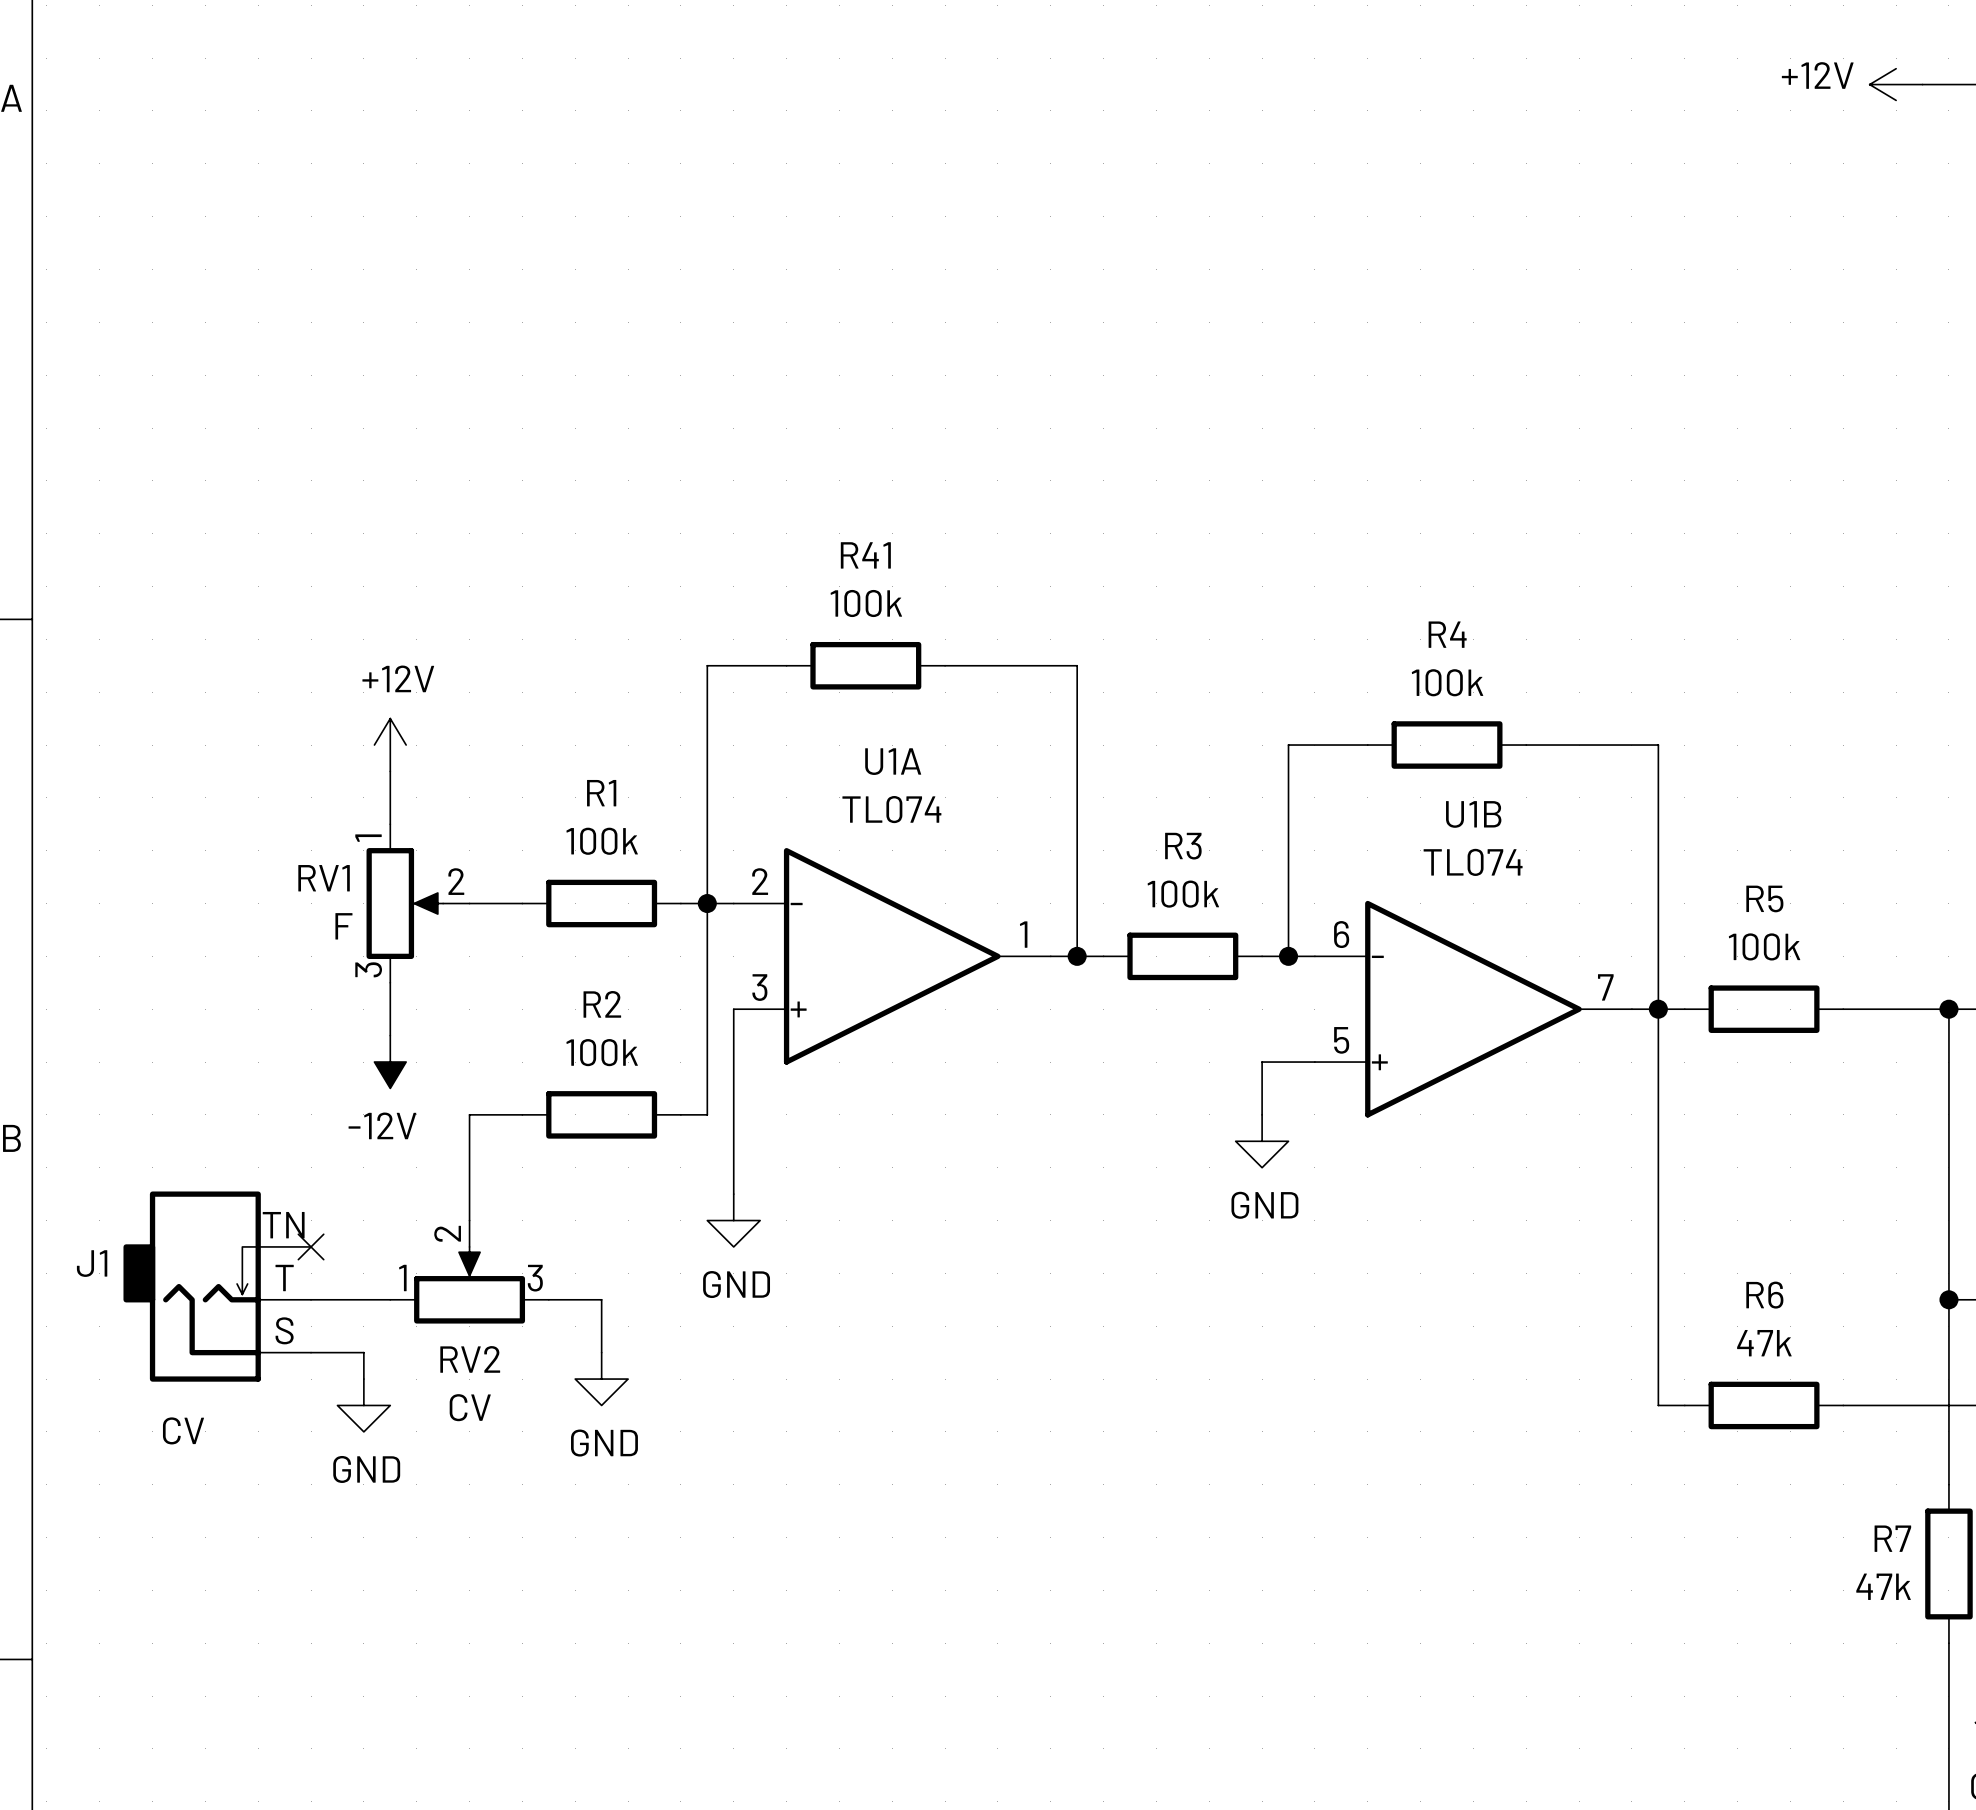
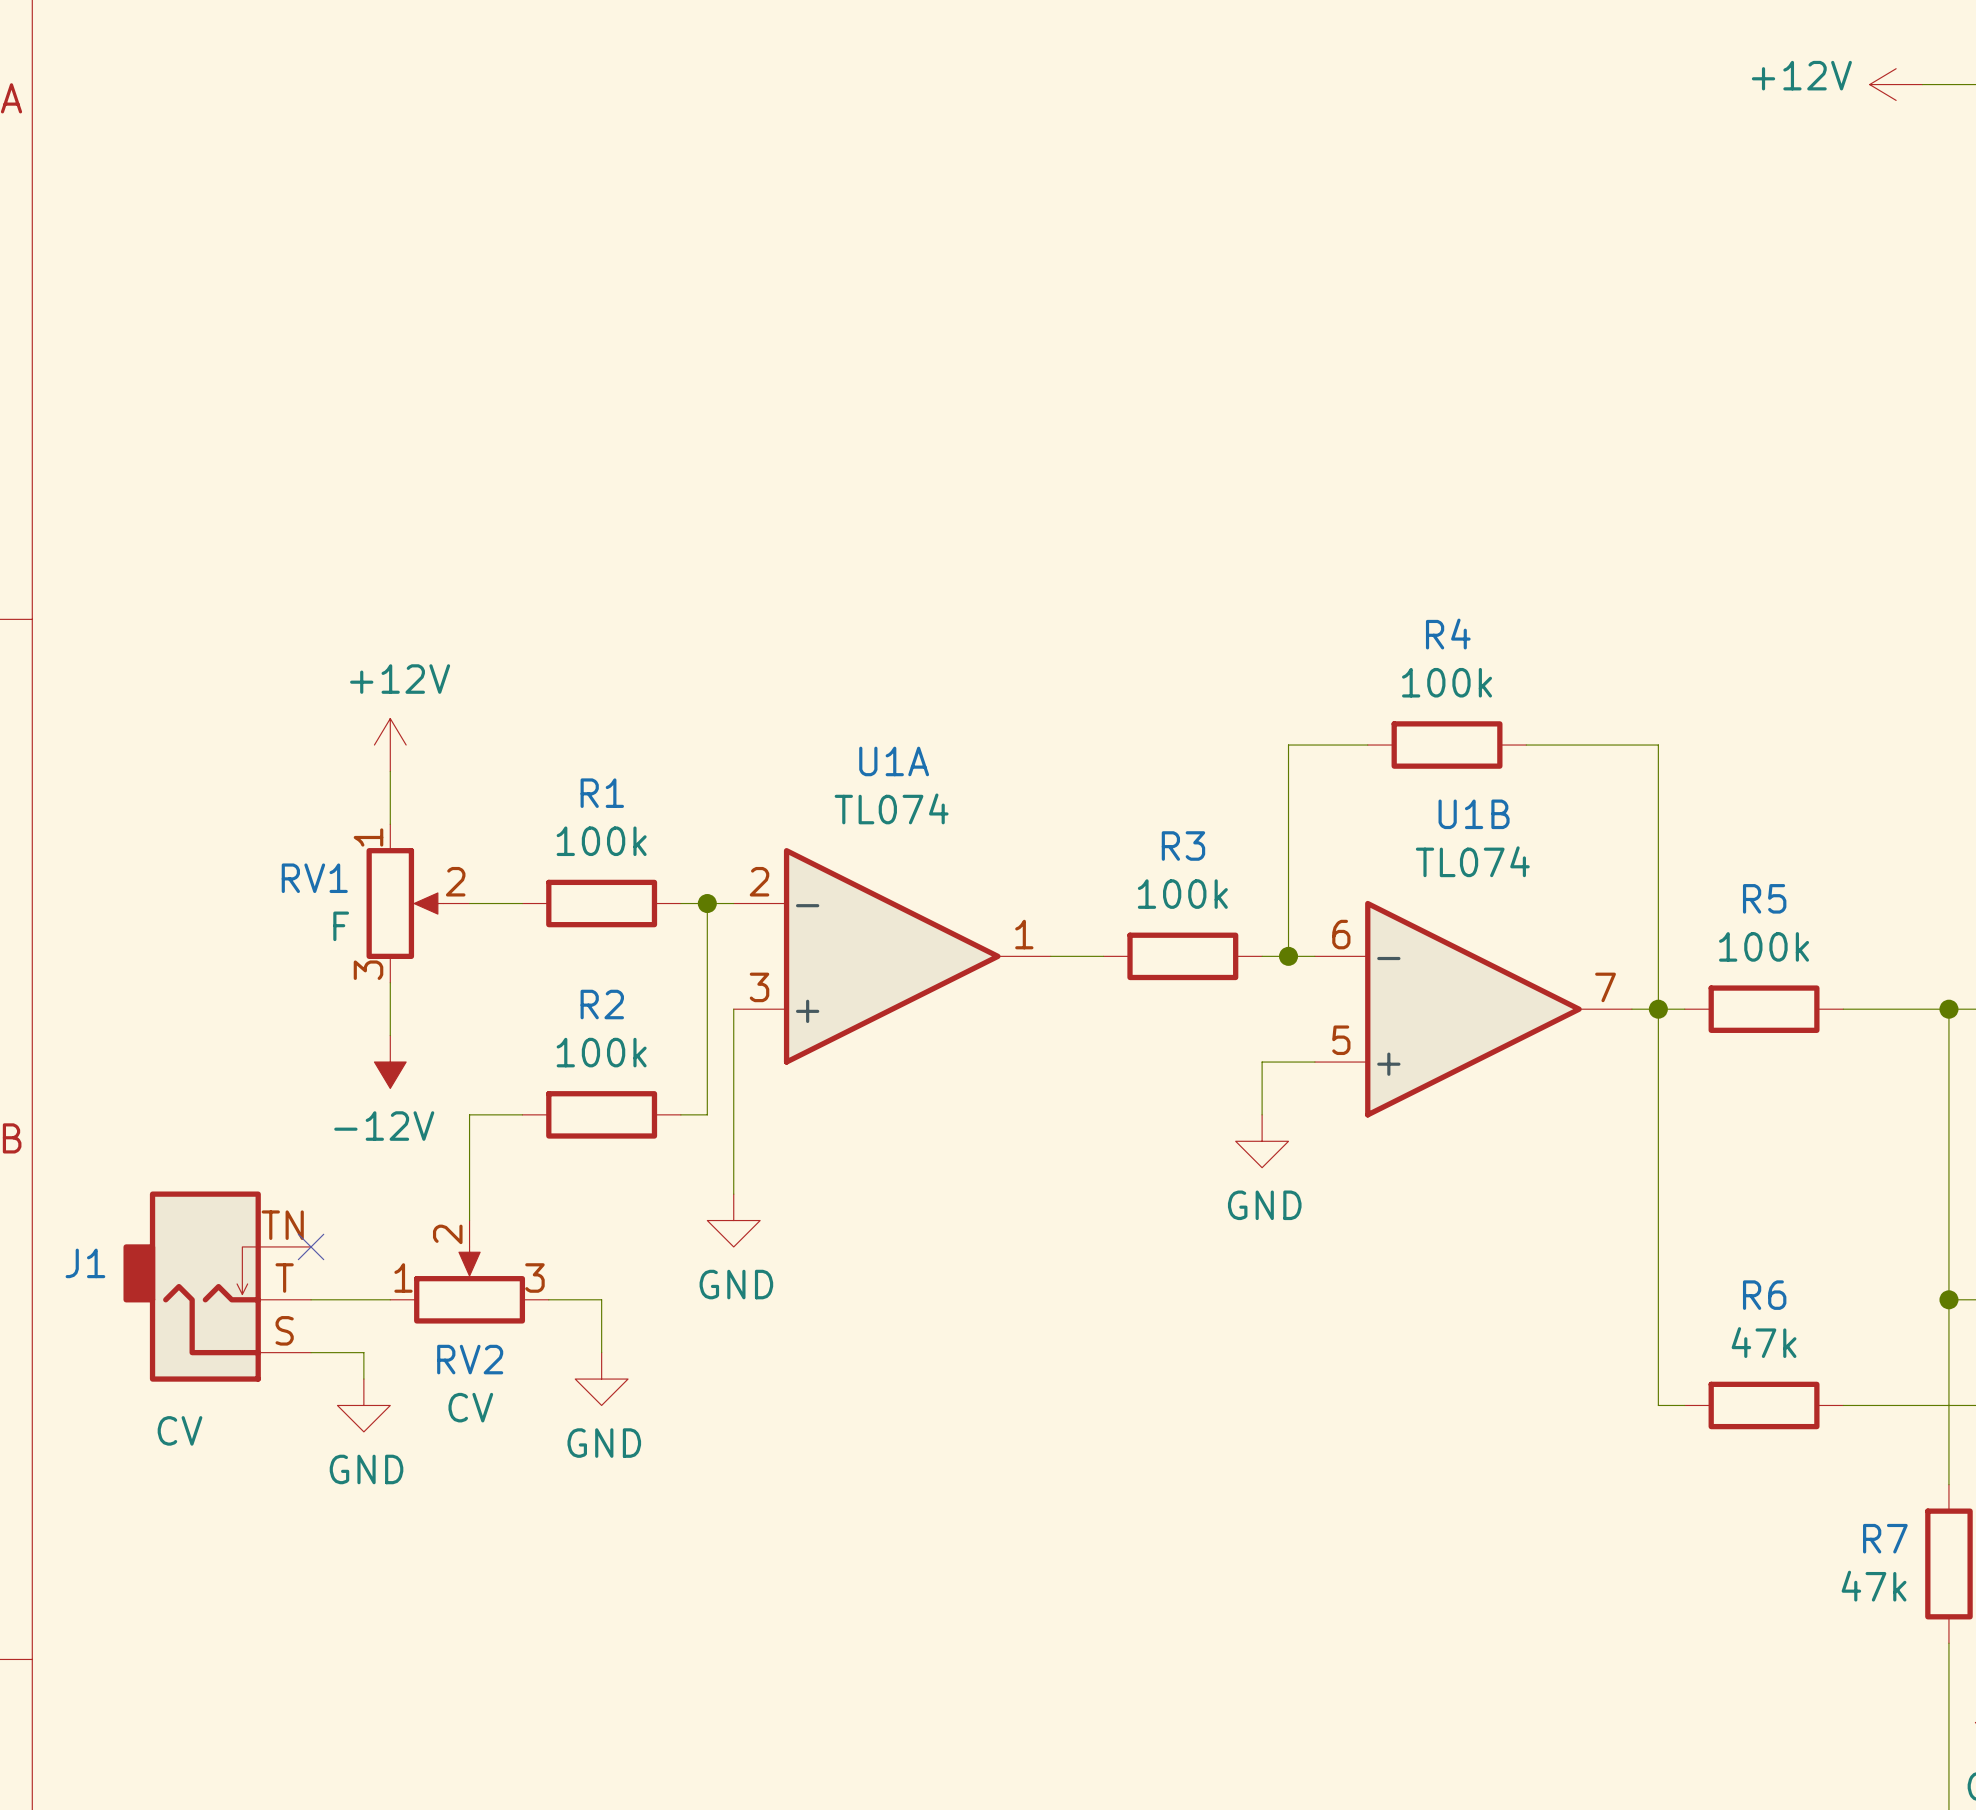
wire: (786, 665) (707, 665) (707, 903) -> none
R41: 100k (865, 665) -> none
wire: (945, 665) (1077, 665) (1077, 956) -> none
junction: (1077, 956) -> none

